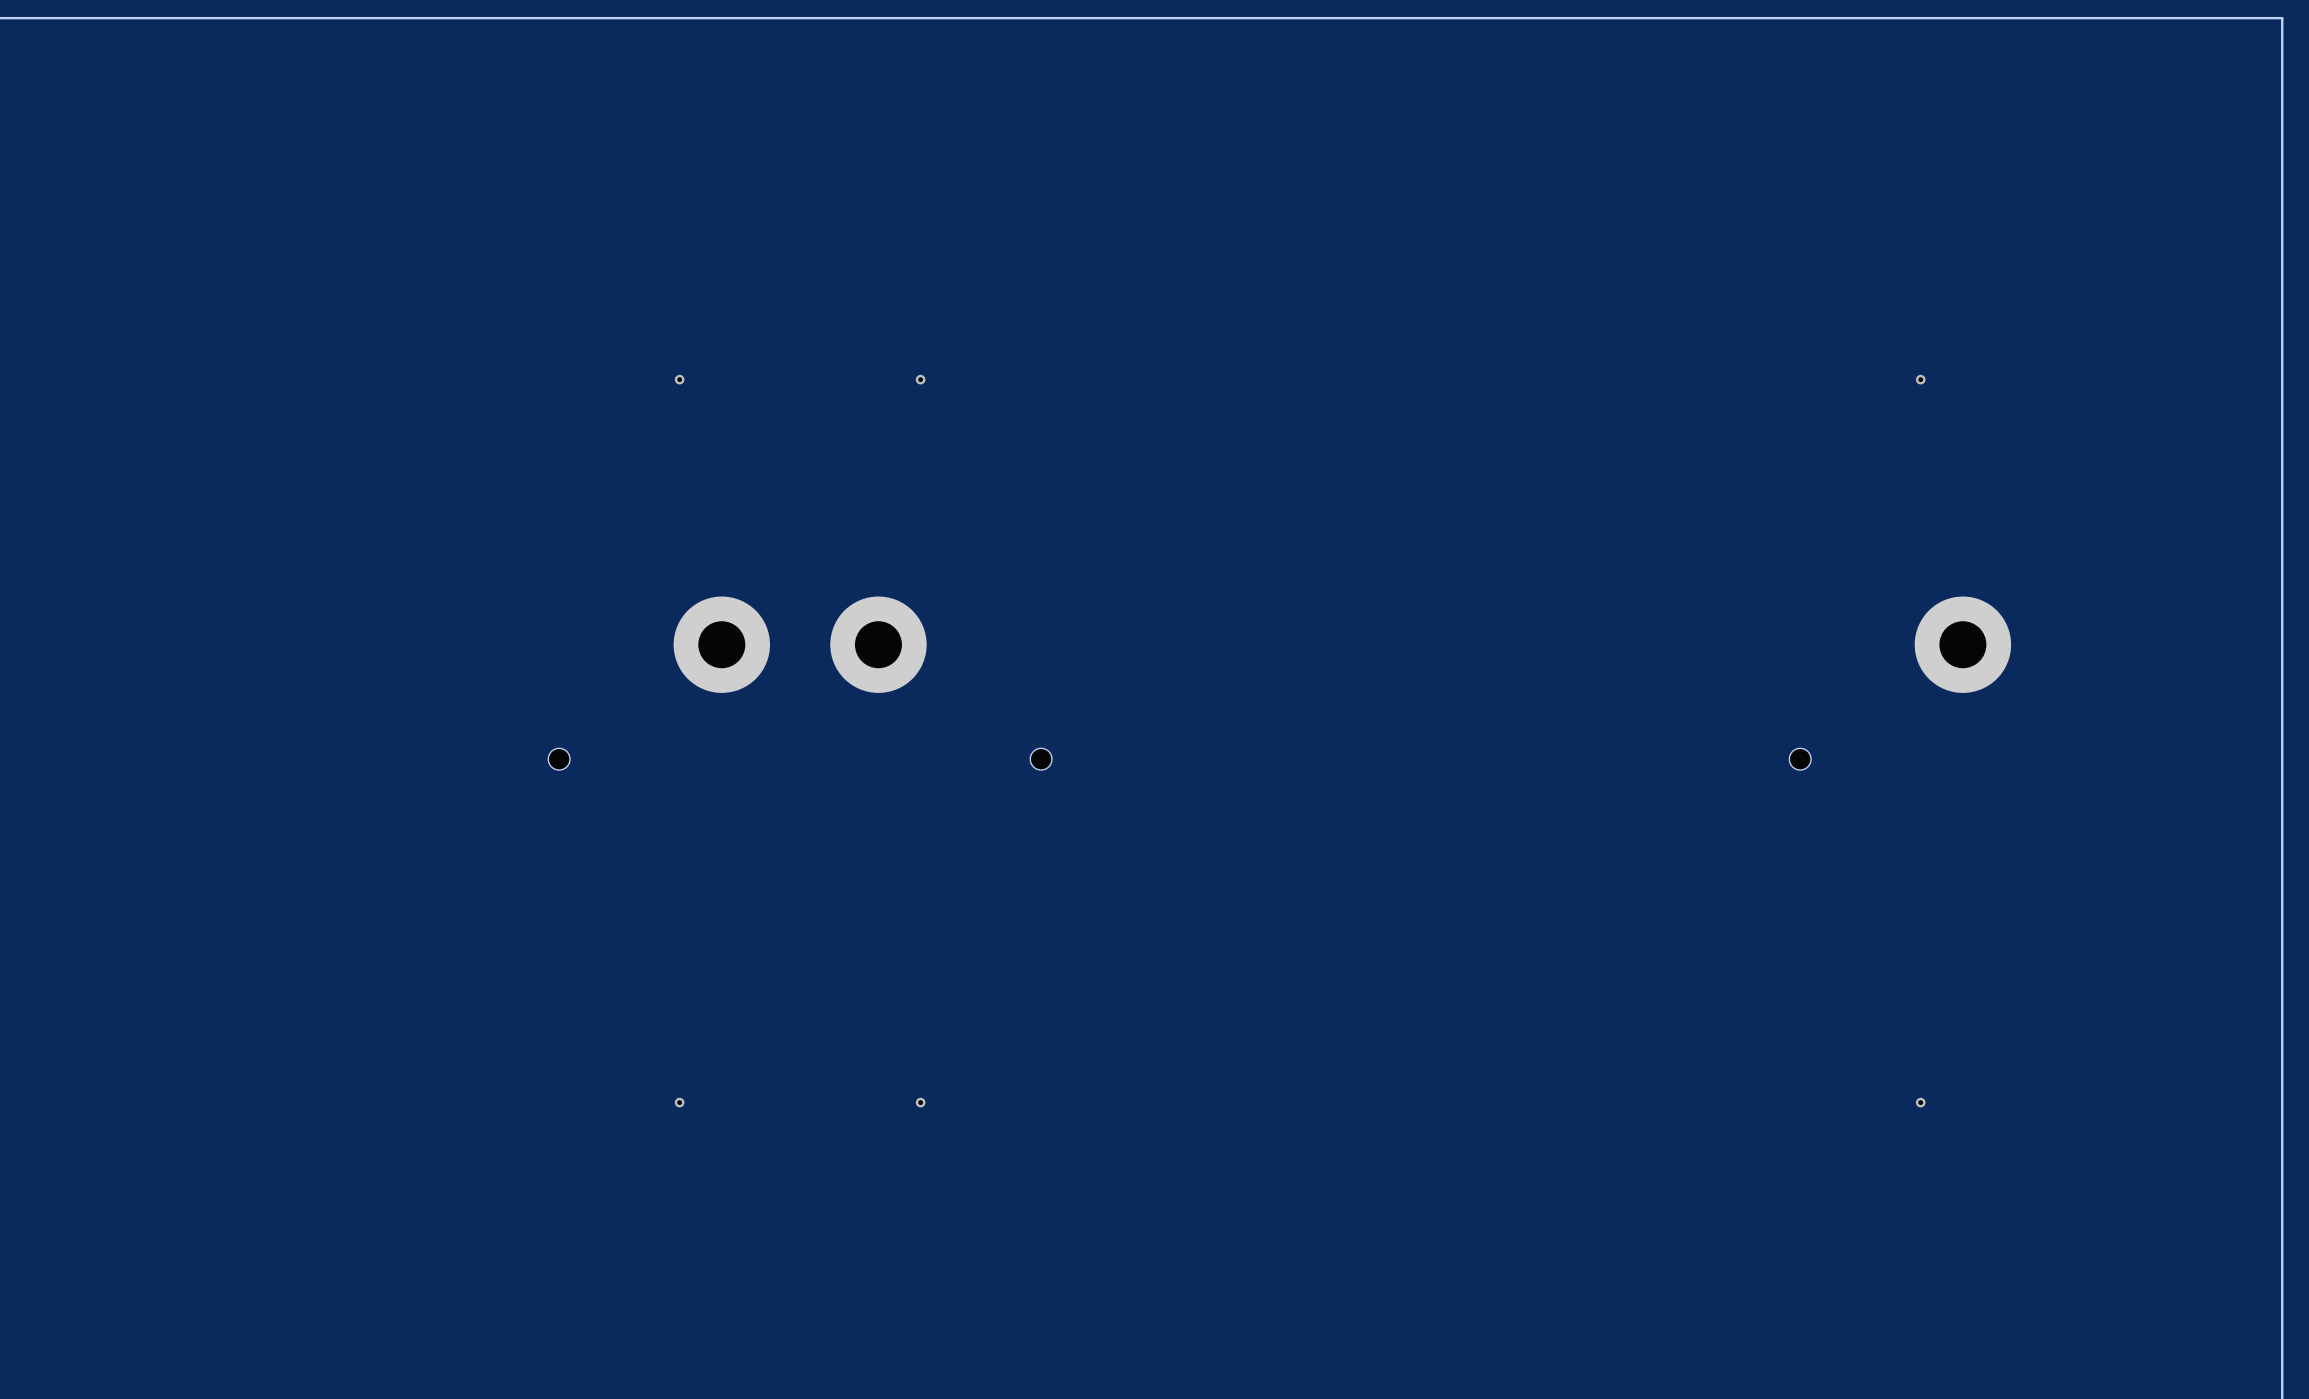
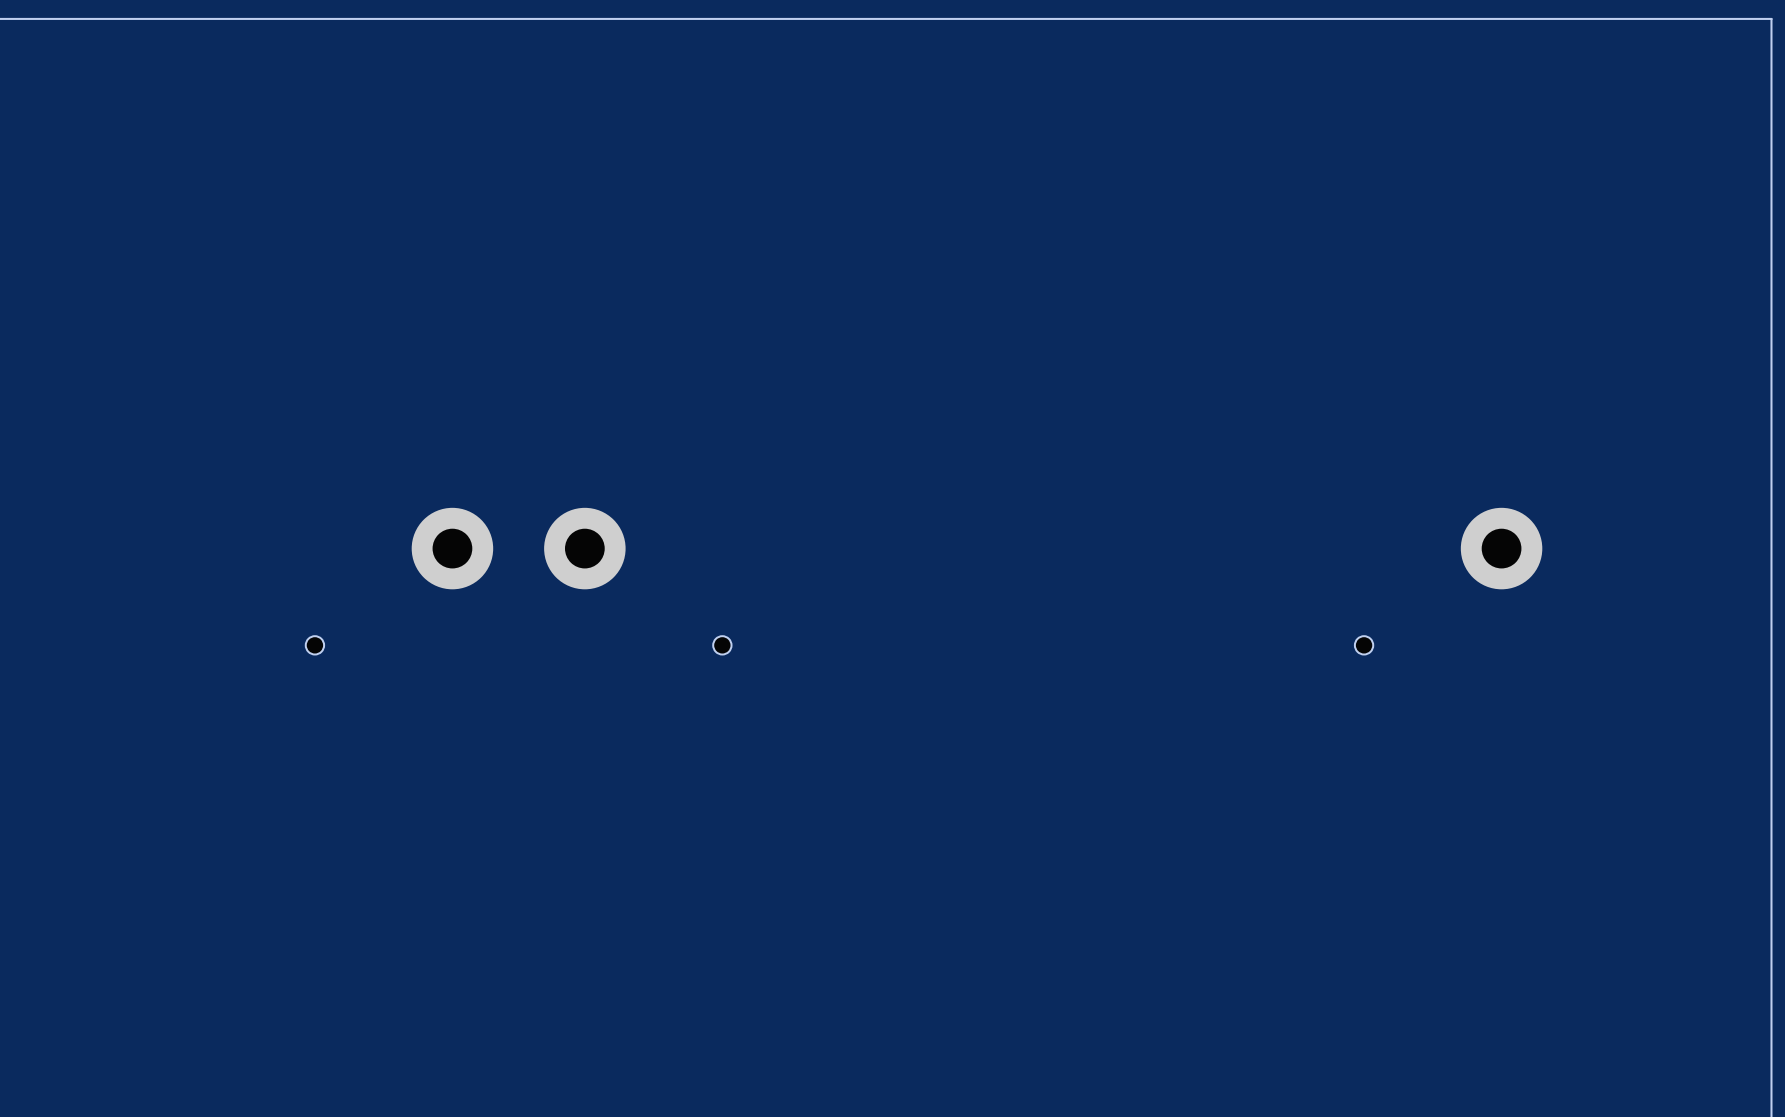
via: (679, 379) -> none
via: (920, 379) -> none
via: (1920, 379) -> none
via: (679, 1102) -> none
via: (920, 1102) -> none
via: (1920, 1102) -> none

